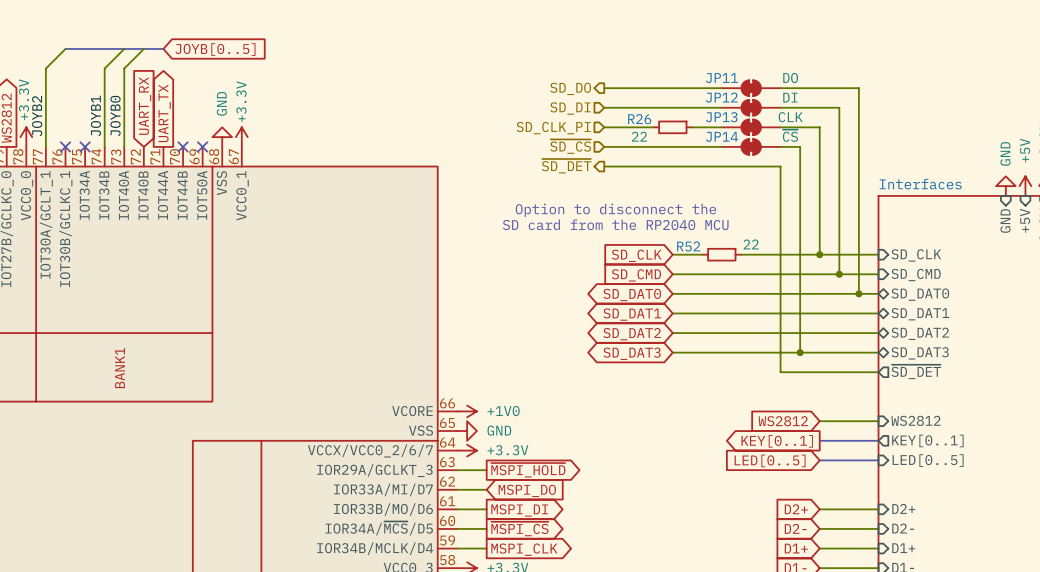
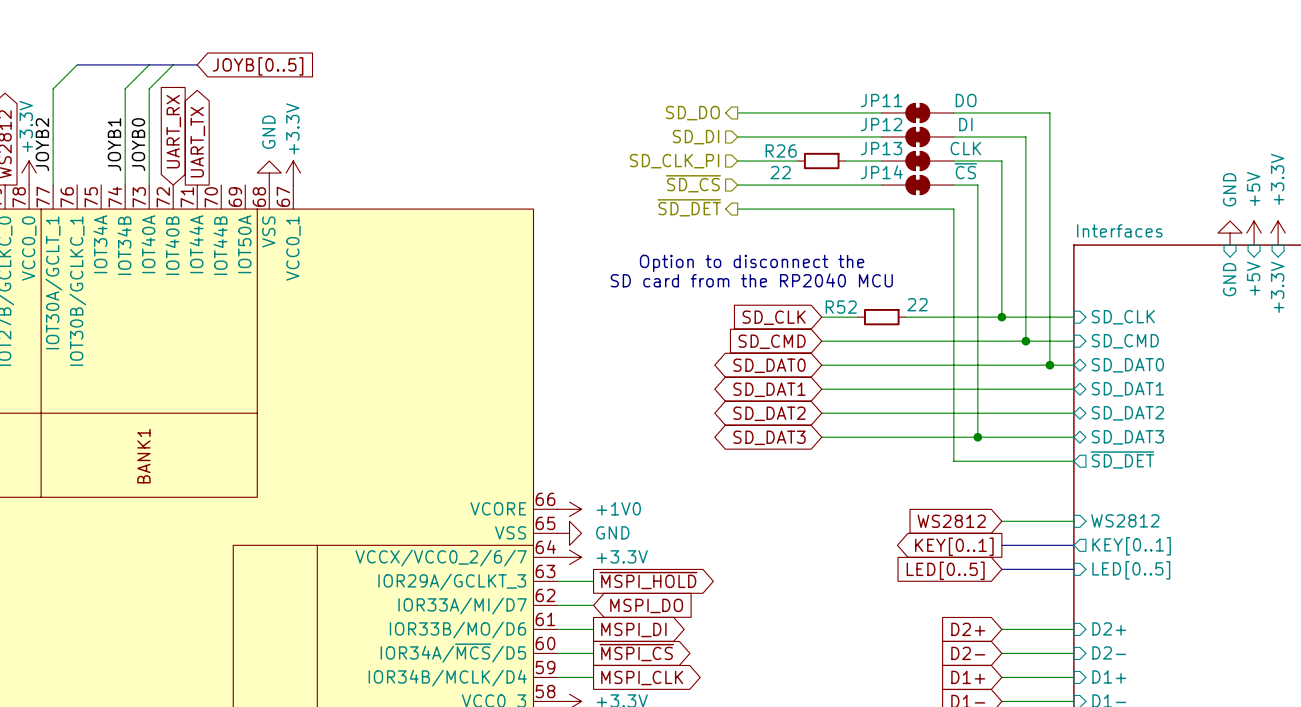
no-connect mark: (65, 146) -> none
no-connect mark: (85, 146) -> none
no-connect mark: (183, 146) -> none
no-connect mark: (202, 146) -> none

